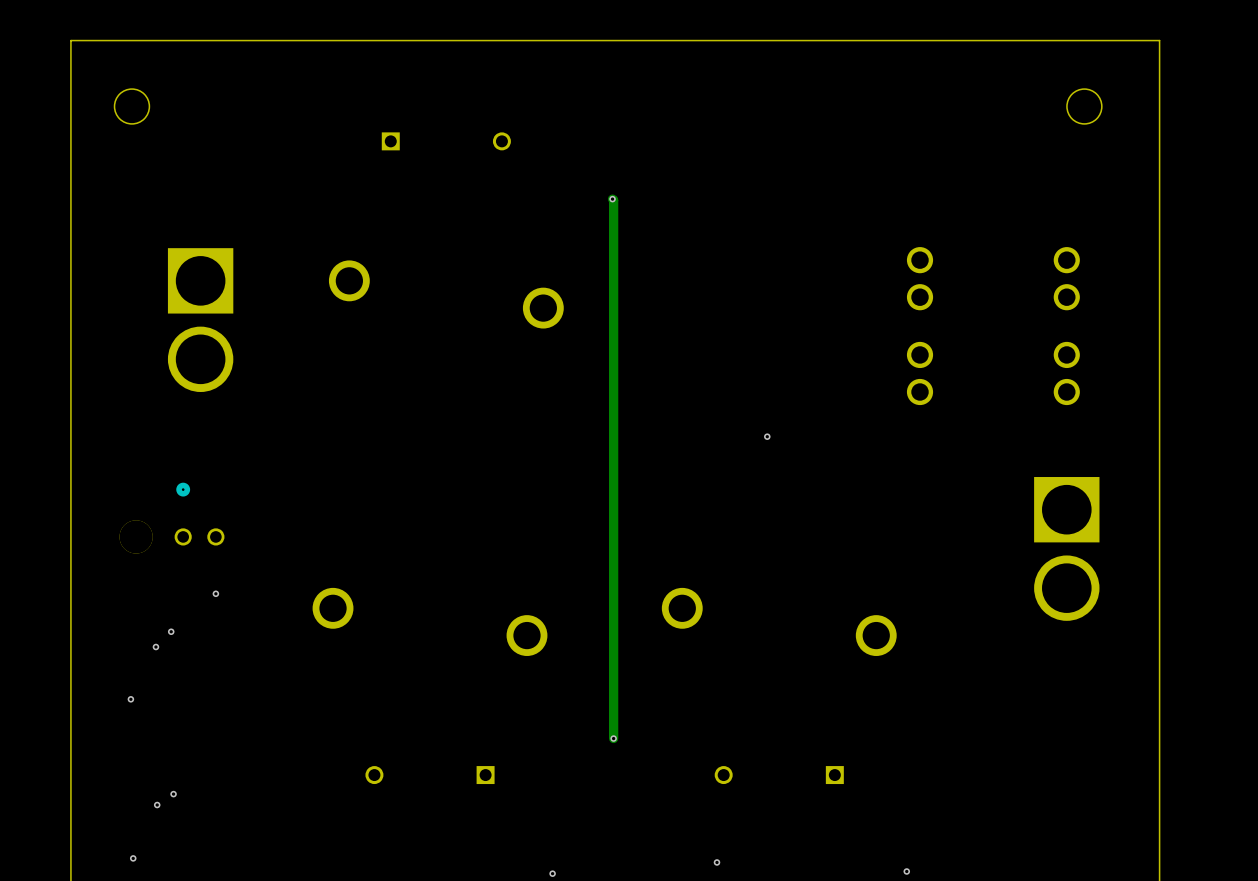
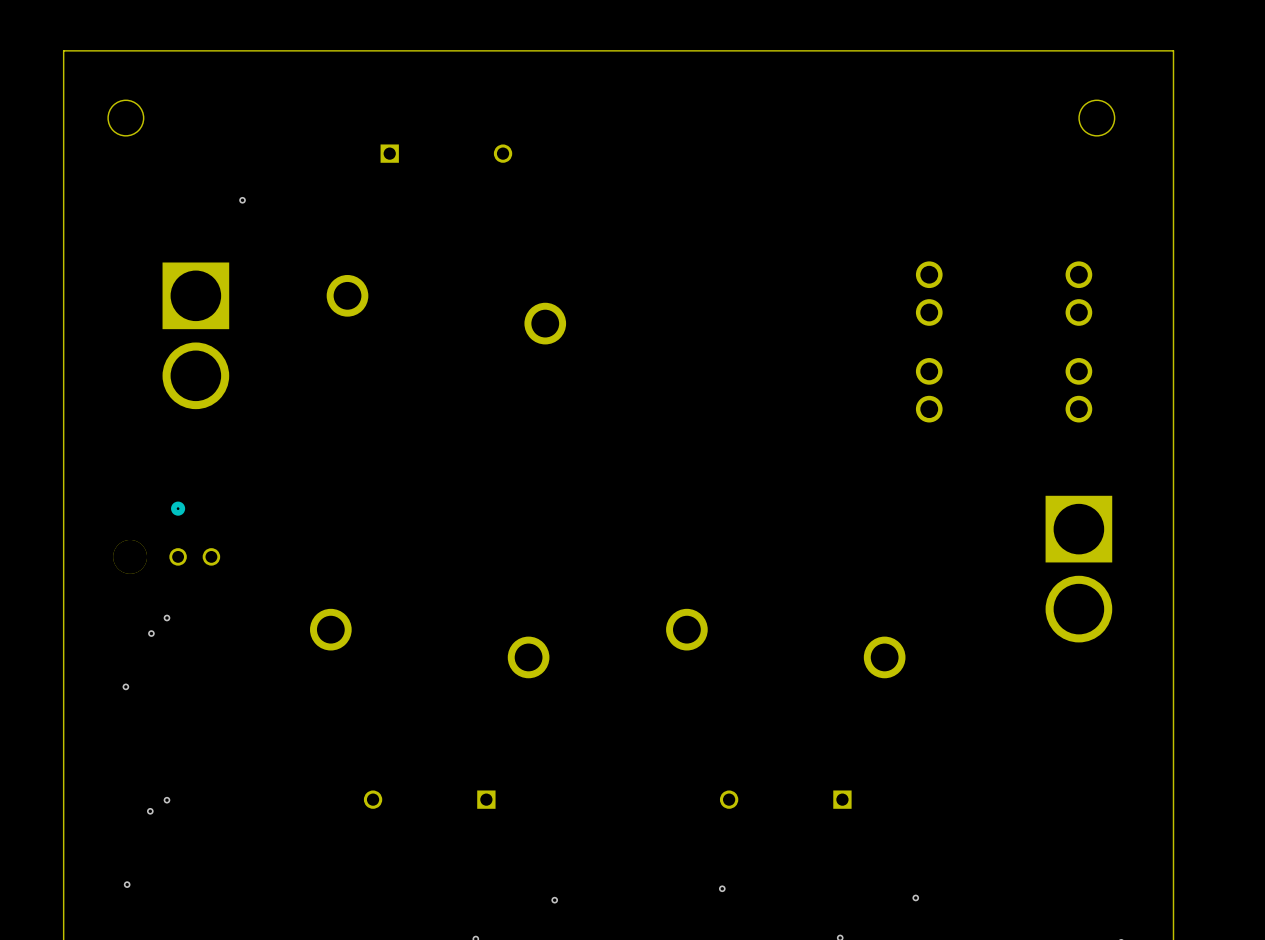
via: none -> (242, 200)
track: (612, 199) (613, 738) -> none
via: (612, 199) -> none
via: (767, 436) -> none
via: (215, 593) -> none
via: none -> (166, 618)
via: none -> (151, 633)
via: (171, 631) -> none
via: (155, 647) -> none
via: none -> (125, 686)
via: (130, 699) -> none
via: (613, 738) -> none
via: none -> (166, 800)
via: none -> (150, 811)
via: (173, 794) -> none
via: (157, 805) -> none

